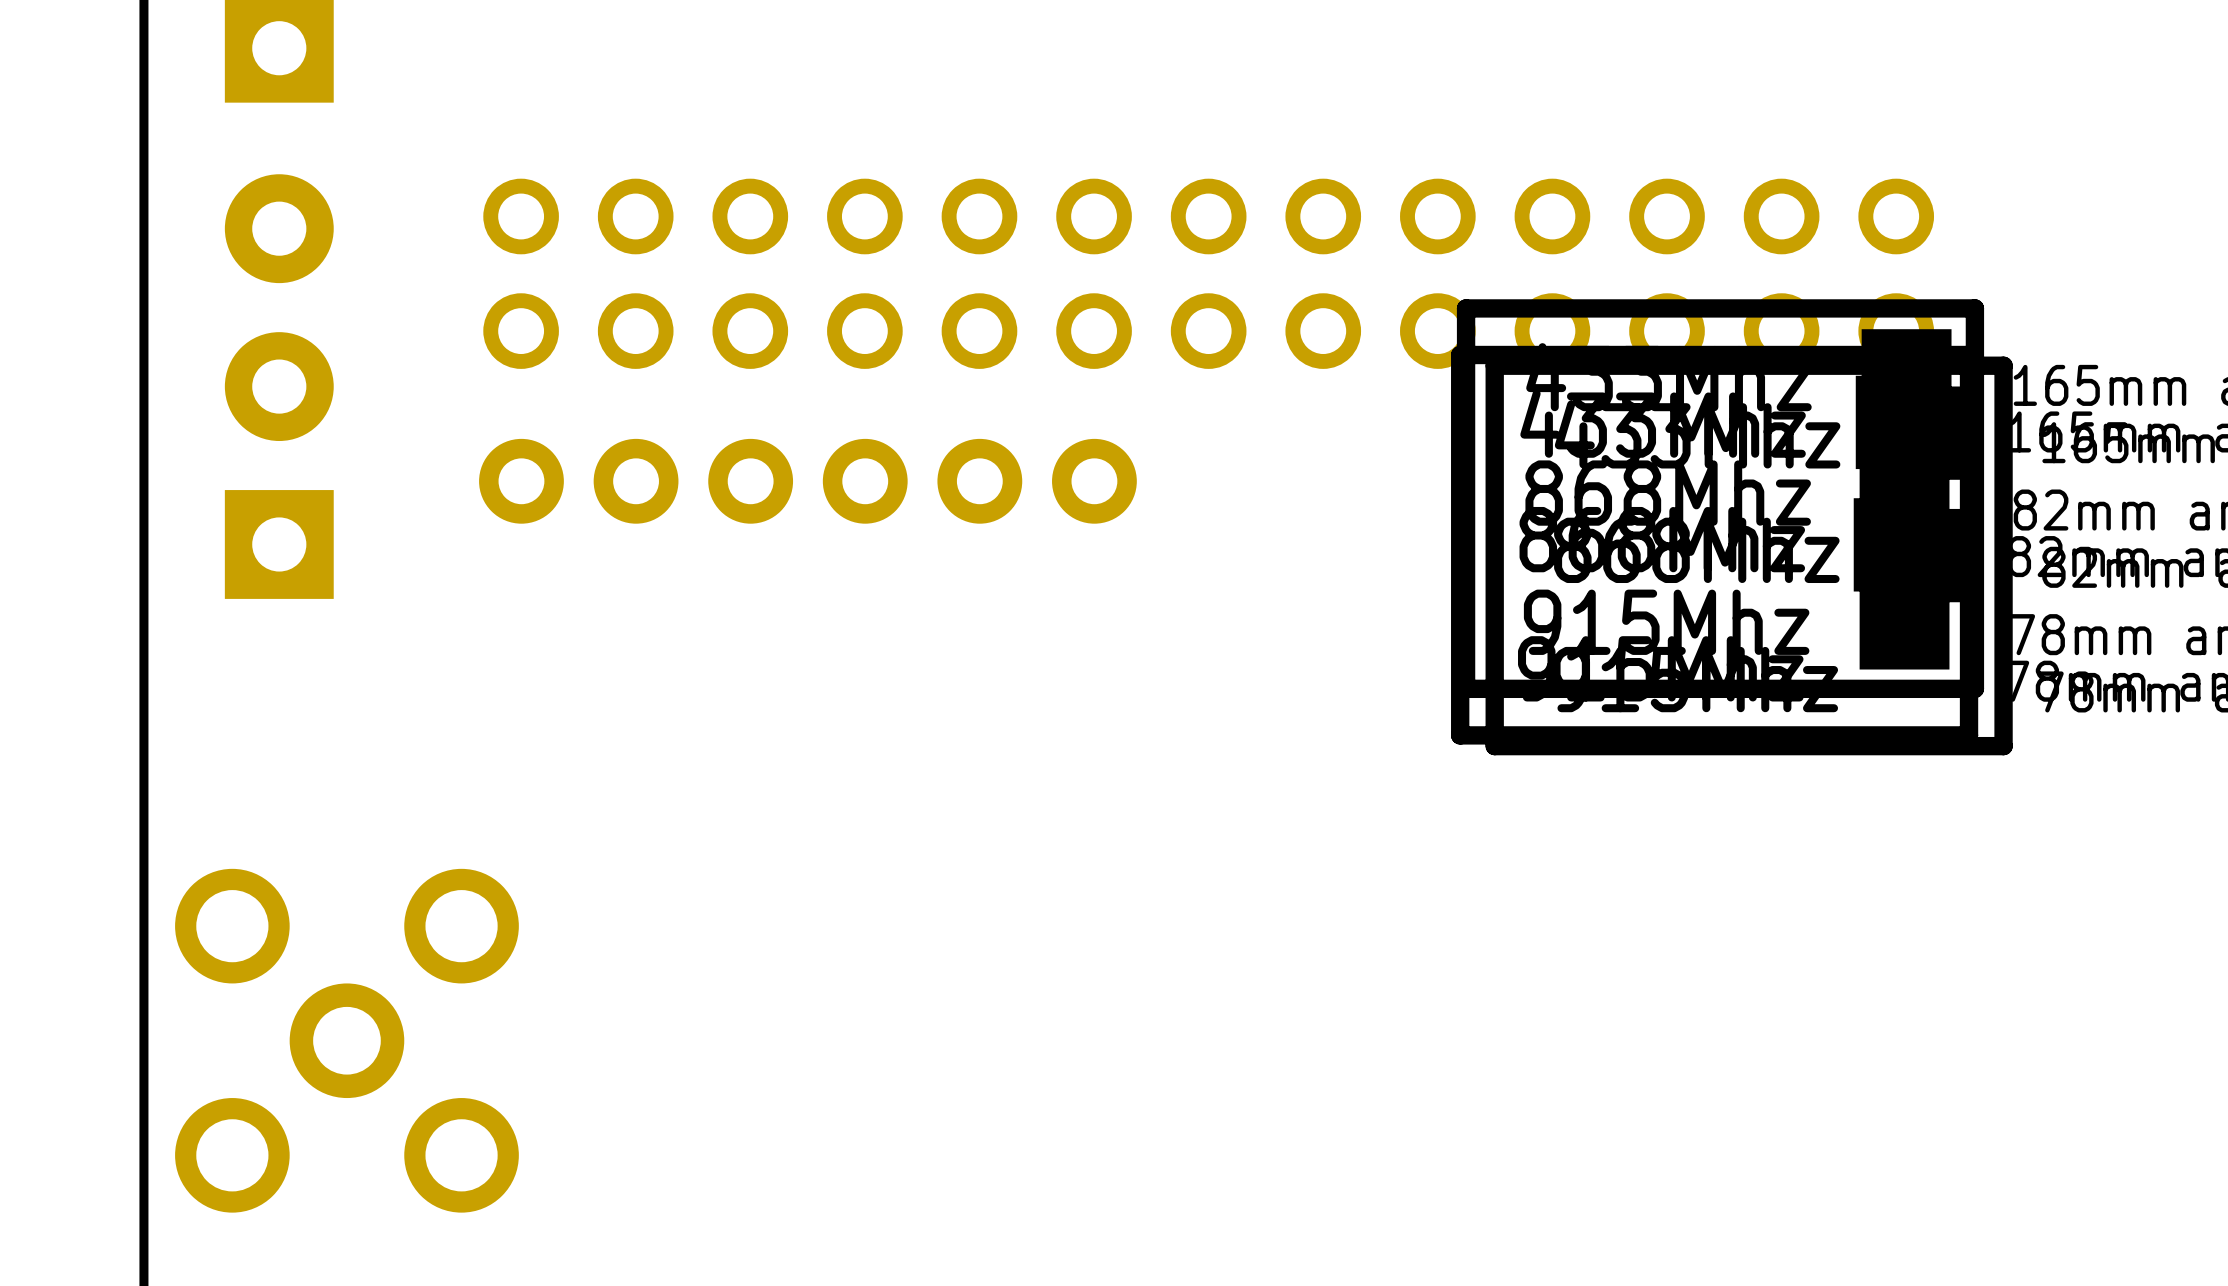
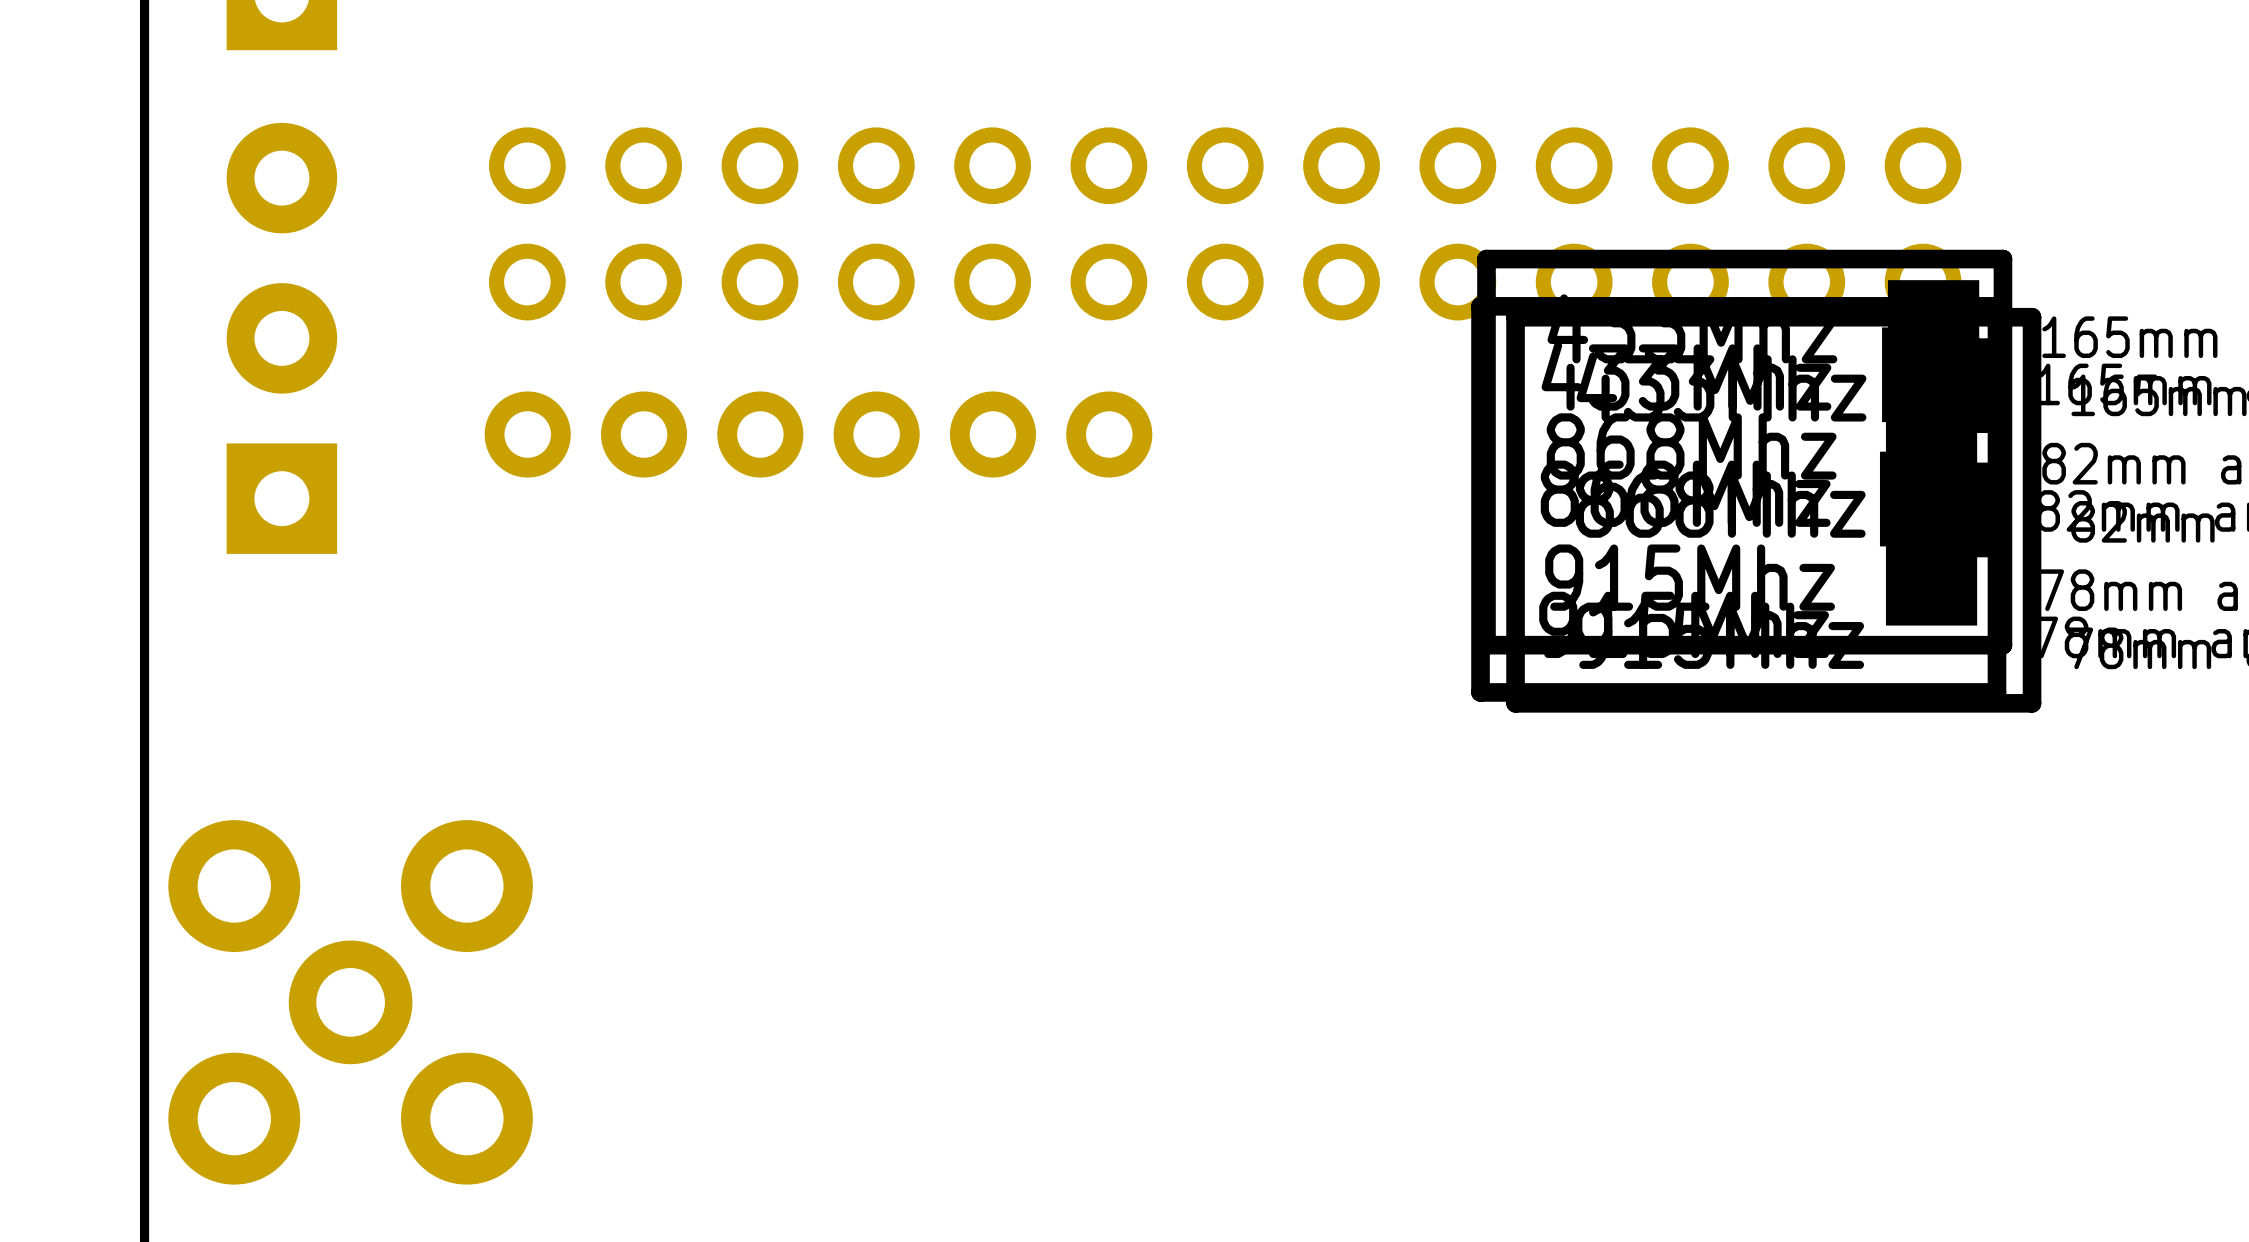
part footprint: [175, 868, 519, 1213] -> [168, 820, 533, 1185]

